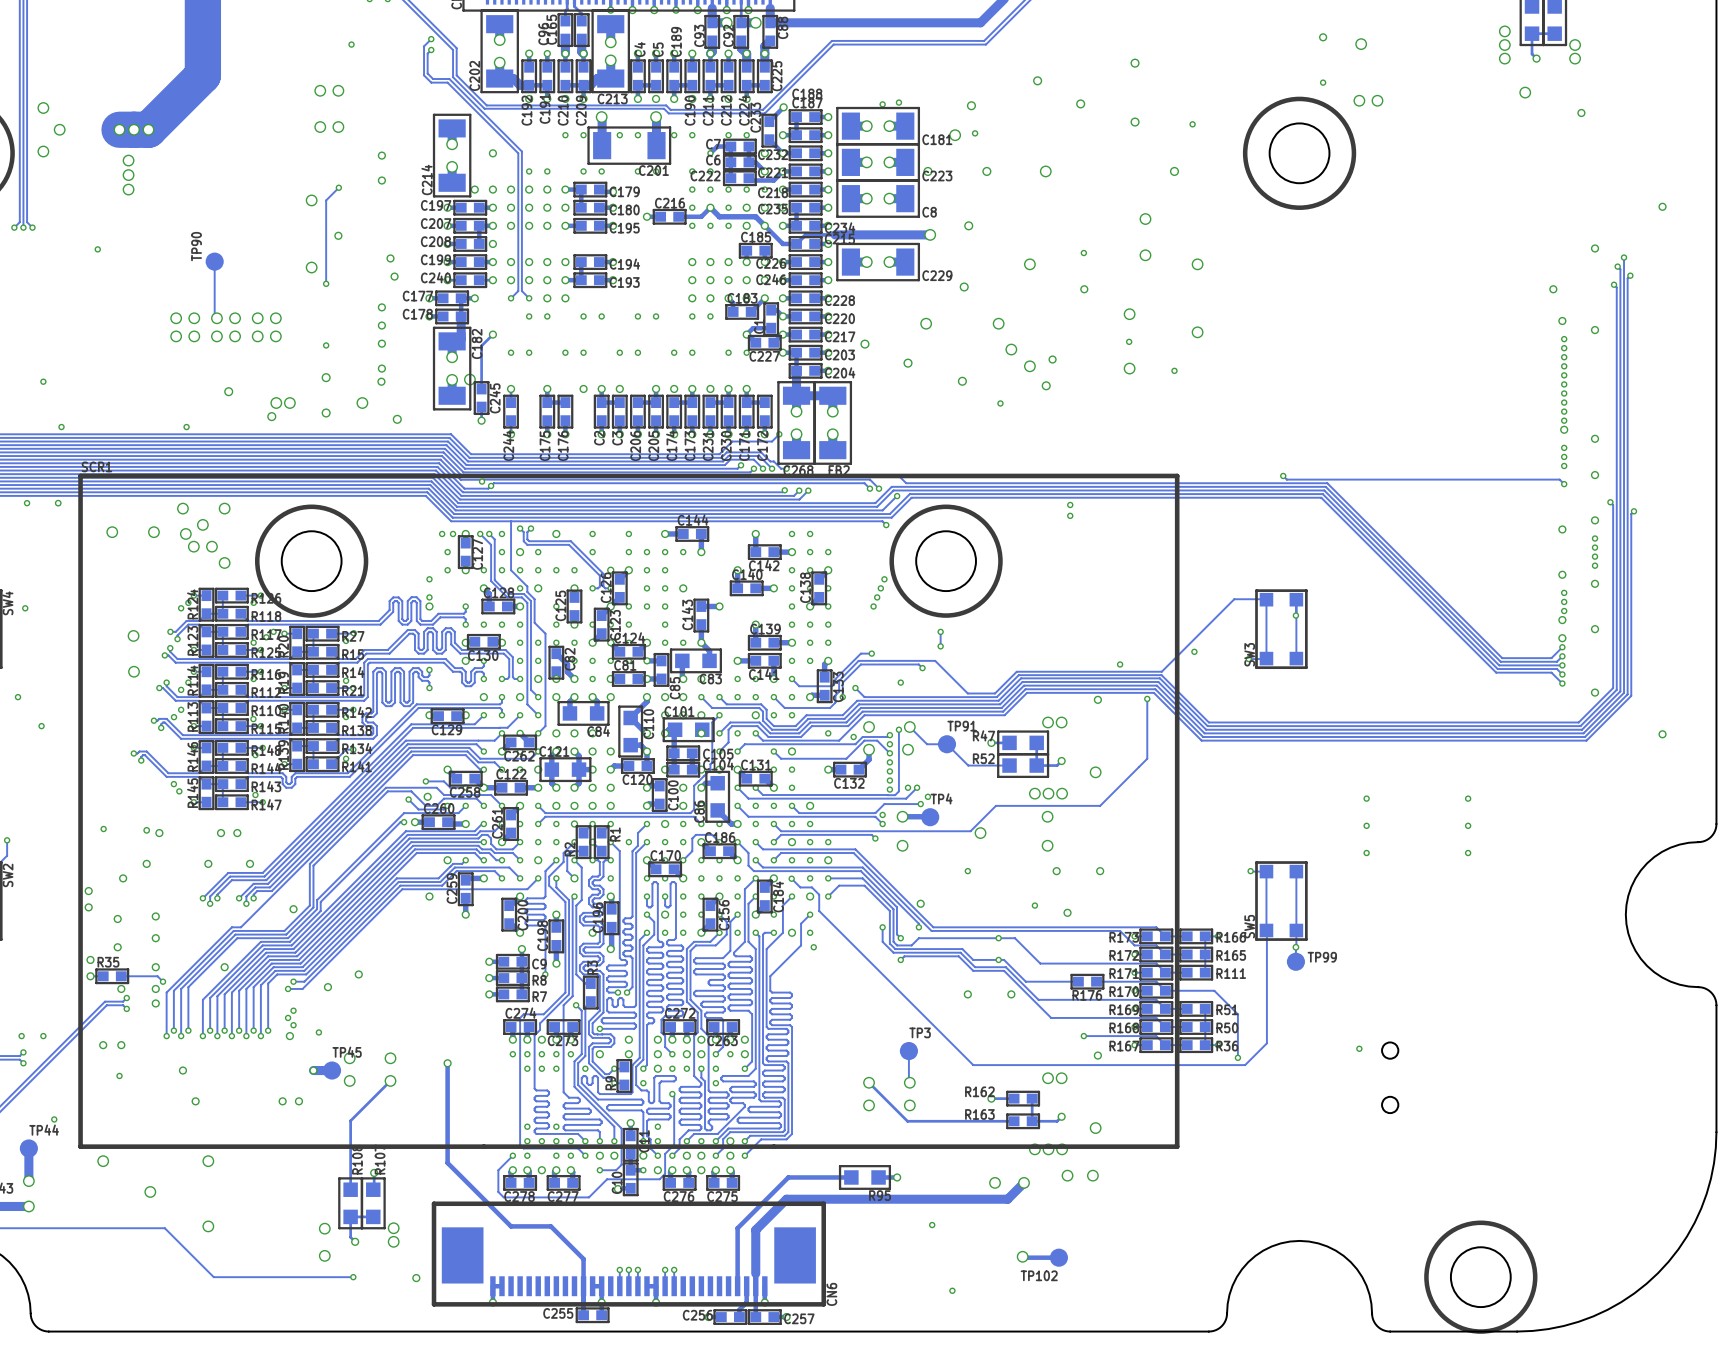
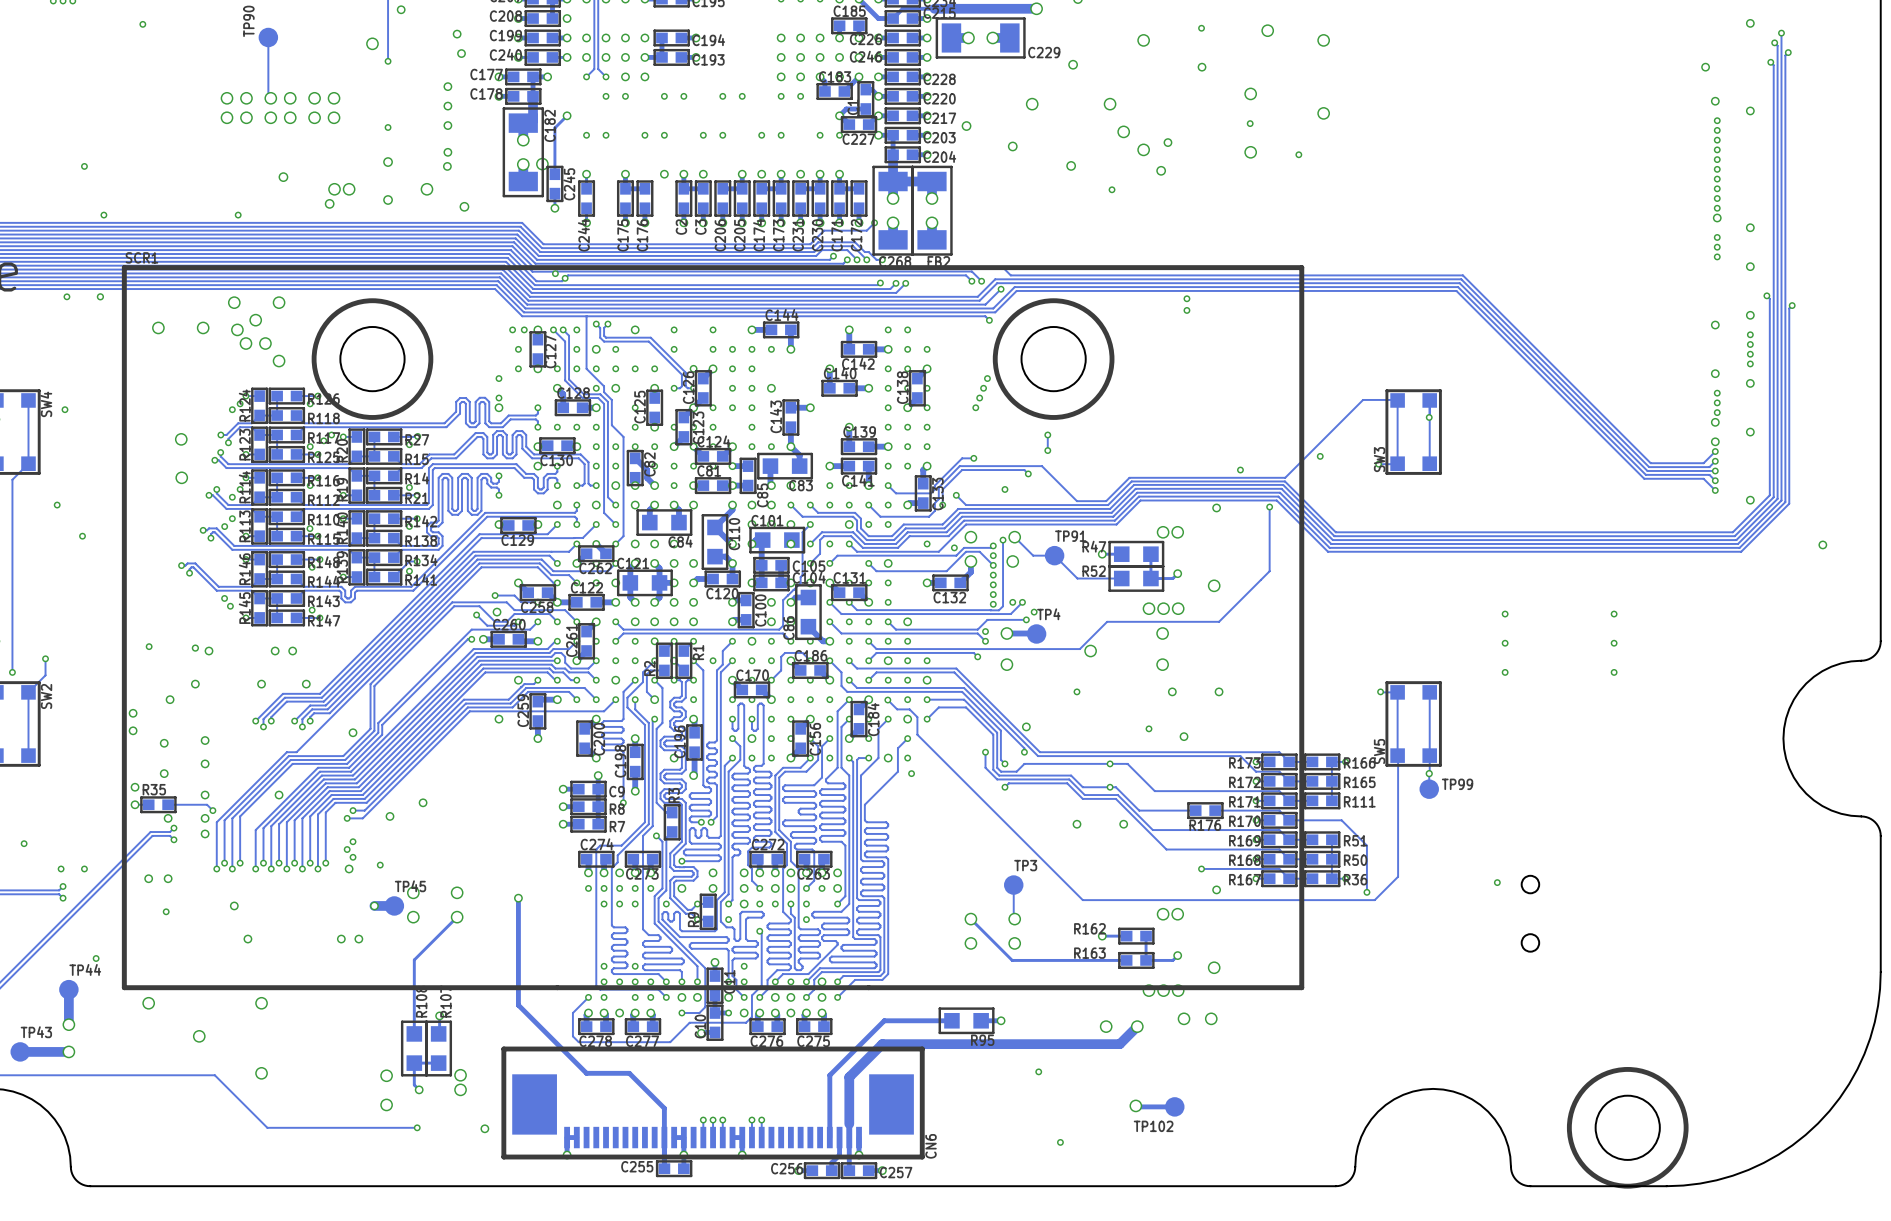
track: (1283, 475) (1286, 479) (1559, 479) (1564, 484) -> none
via: (1283, 475) -> none
via: (1564, 484) -> none

